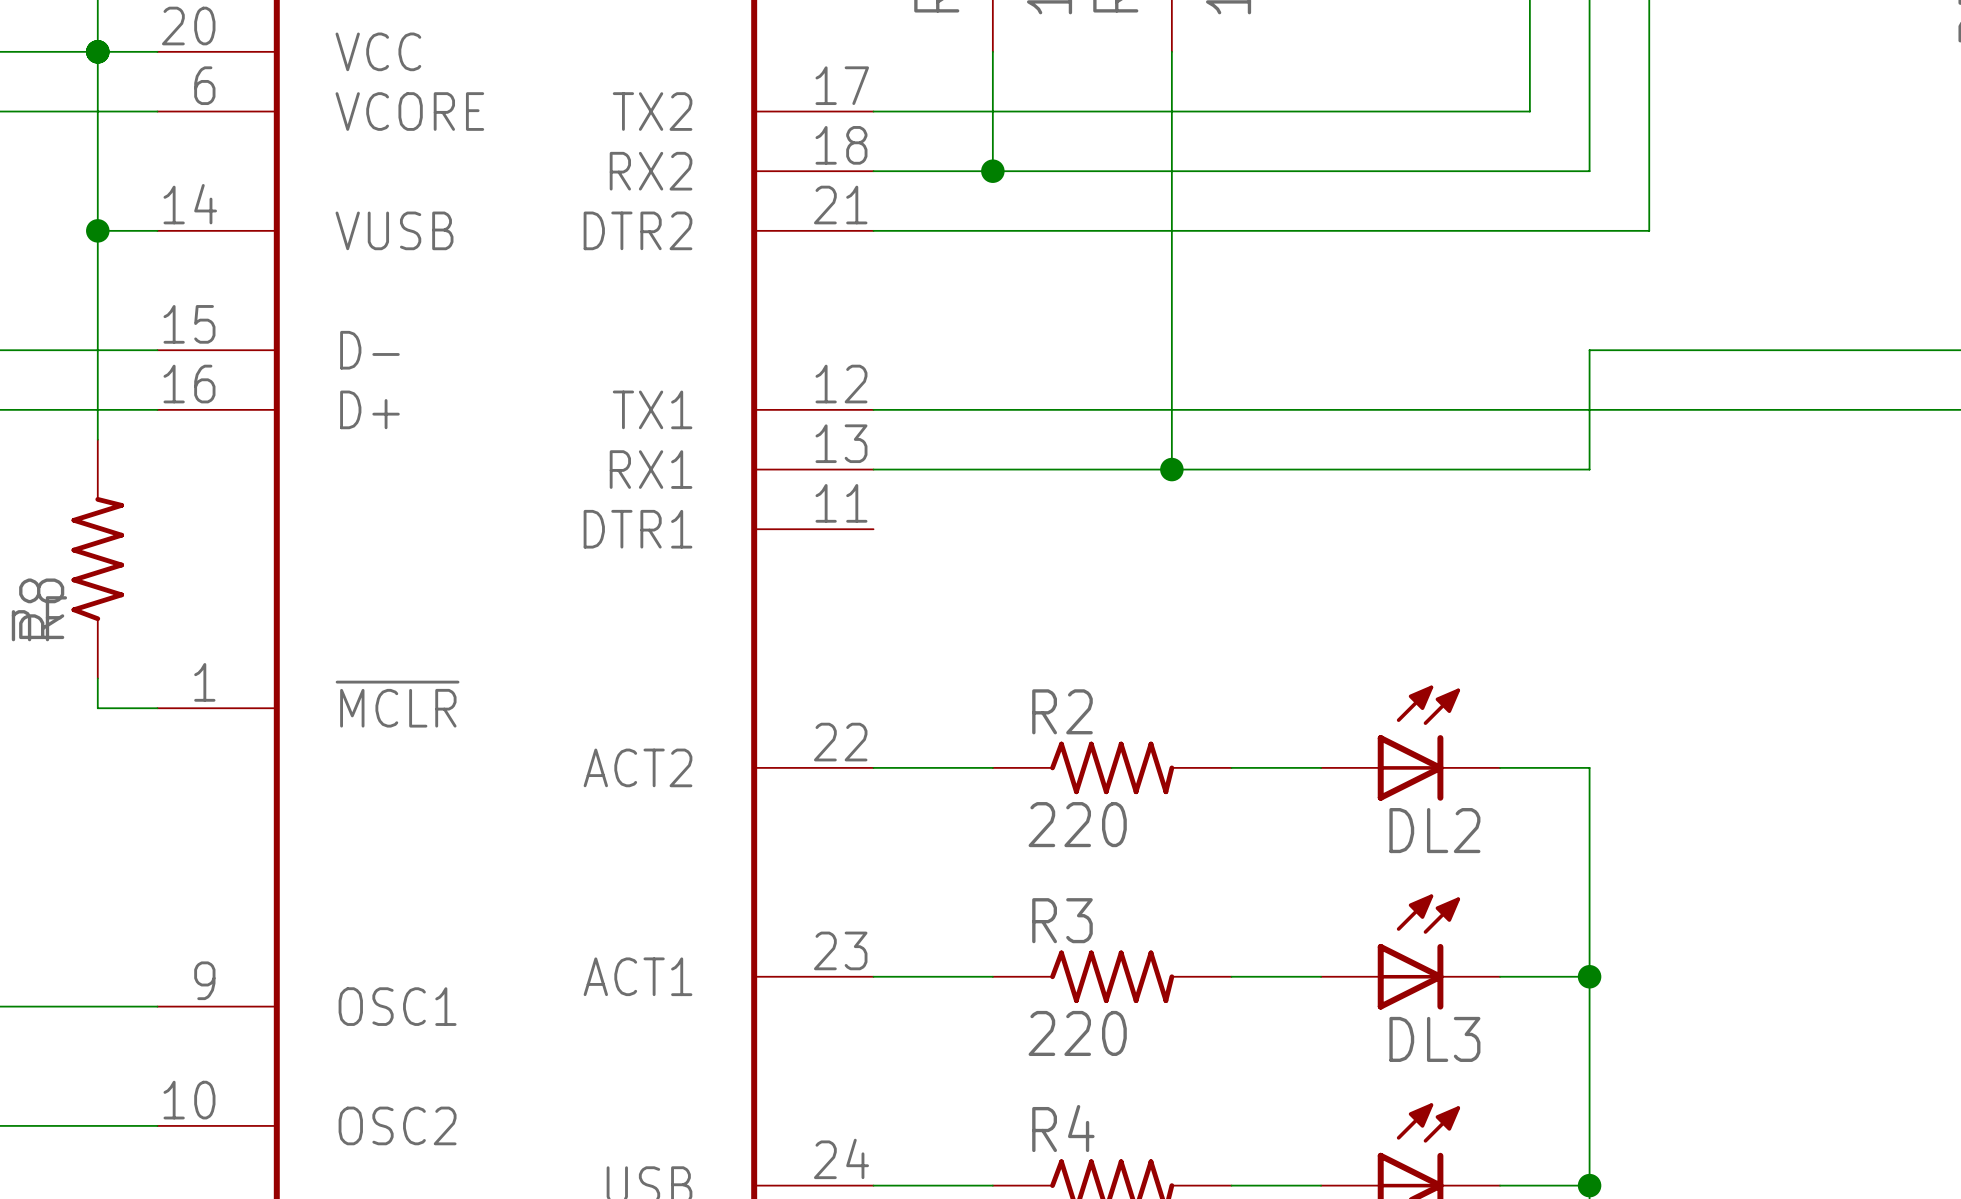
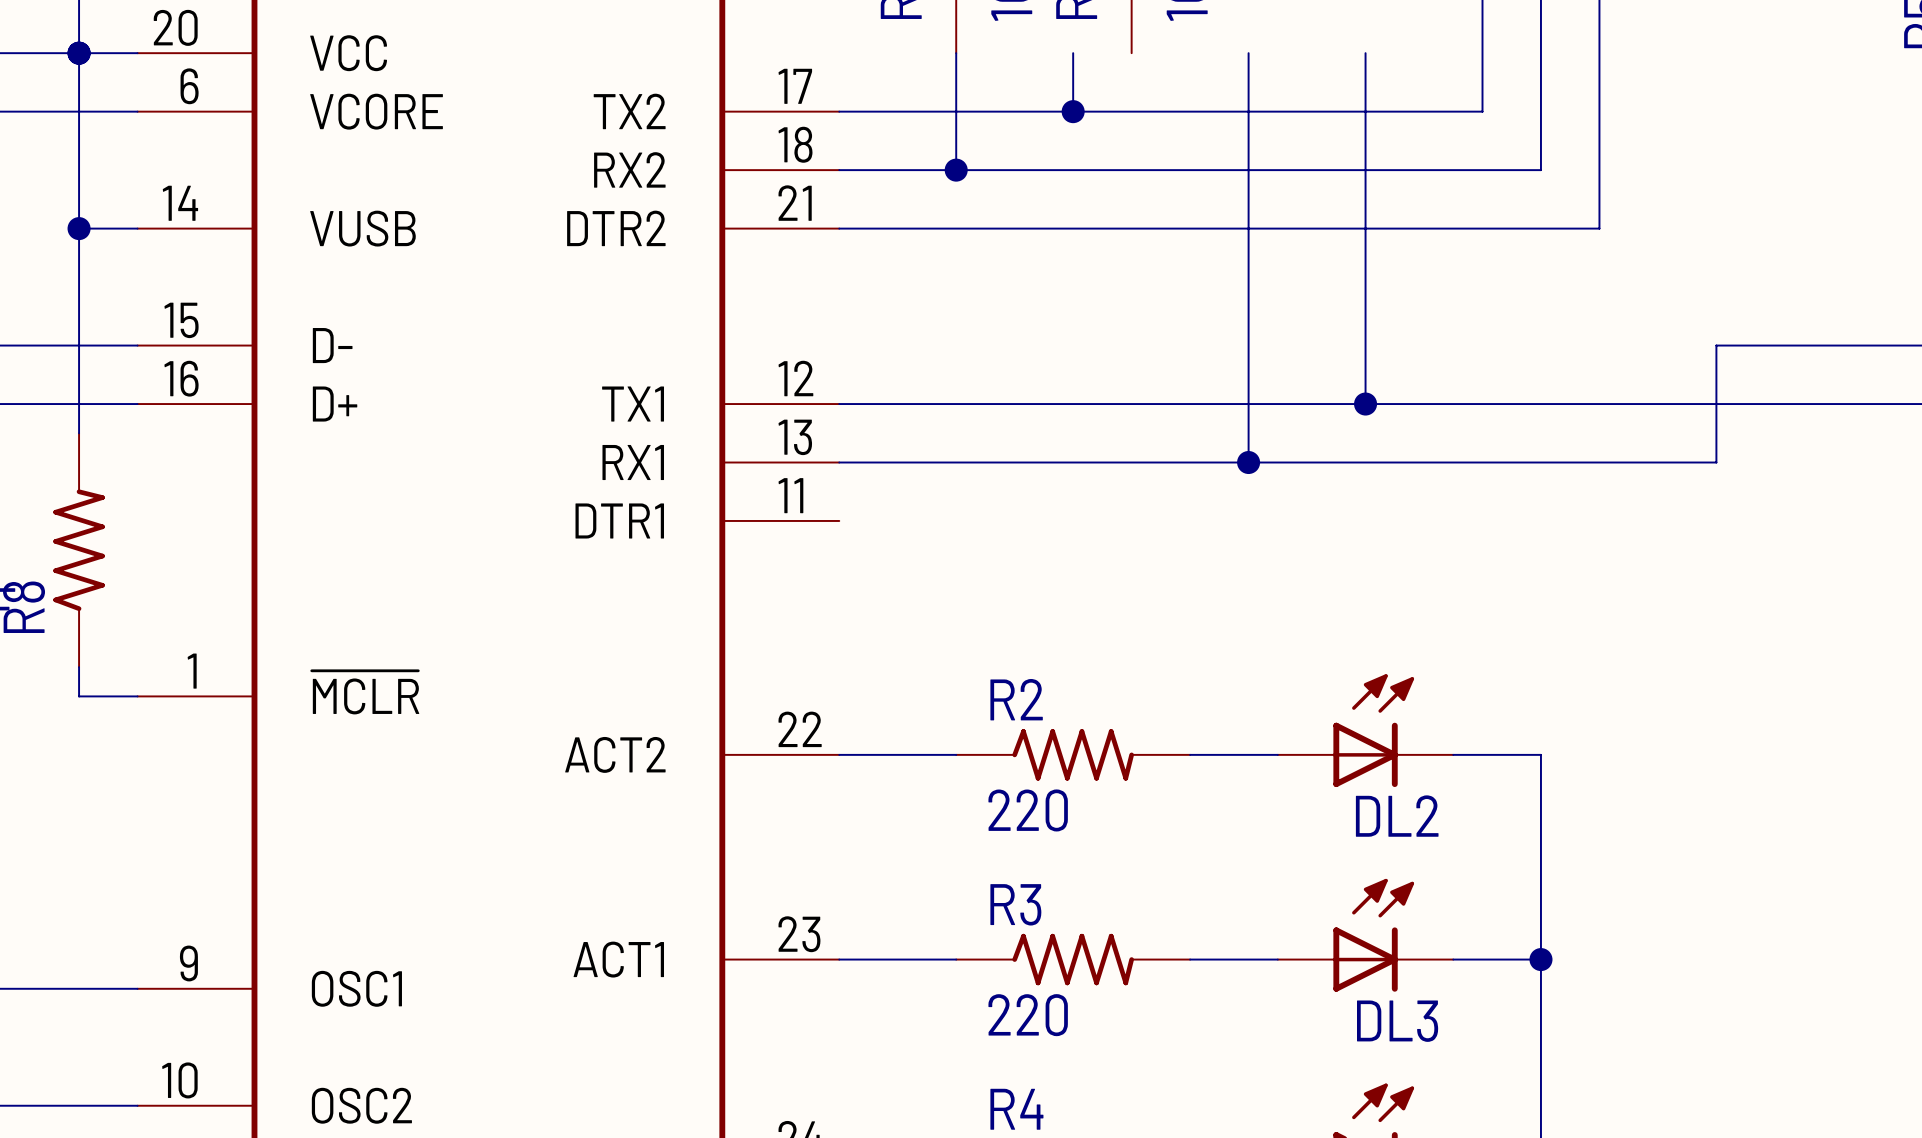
wire: none -> (1073, 53) (1073, 111)
wire: (1171, 51) (1171, 469) -> (1248, 53) (1248, 462)
wire: none -> (1365, 53) (1365, 404)
junction: none -> (1073, 111)
wire: (1768, 350) (1589, 350) (1589, 469) -> (1716, 345) (1716, 462) (1540, 462)
junction: none -> (1365, 404)
junction position: (1171, 469) -> (1248, 462)

